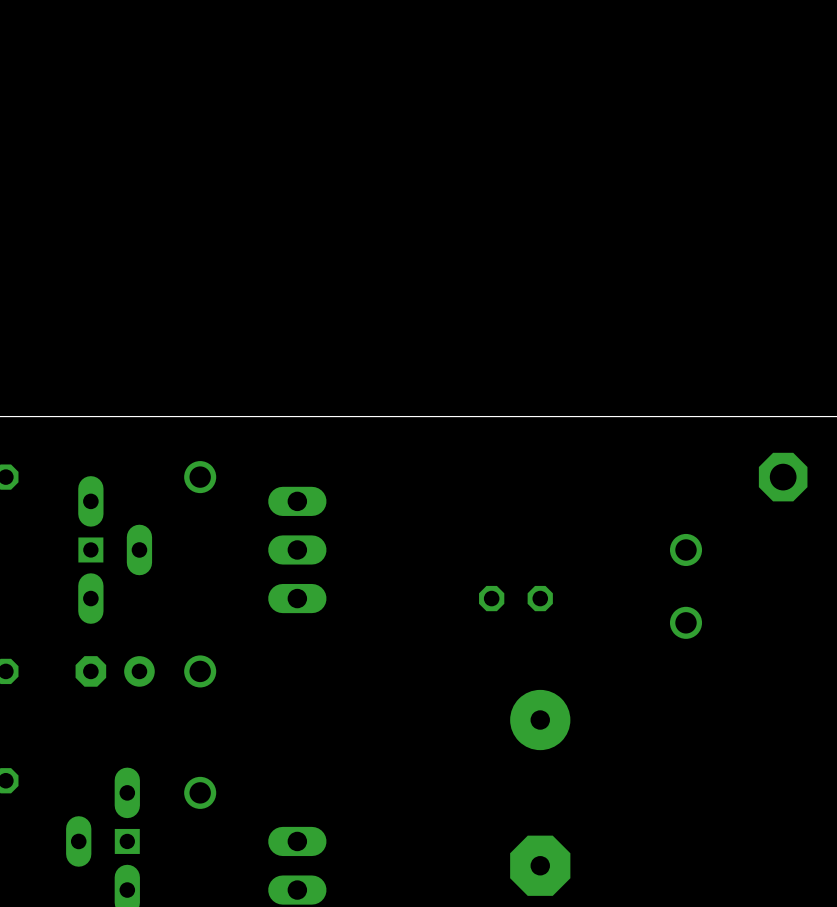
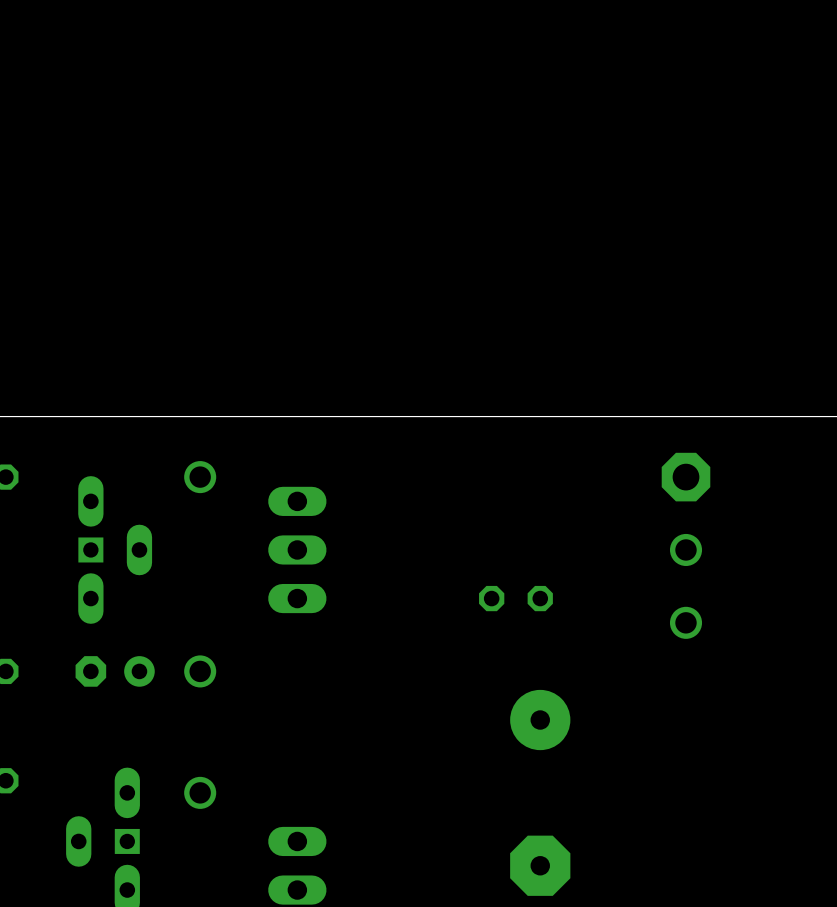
part position: (783, 477) -> (686, 477)

